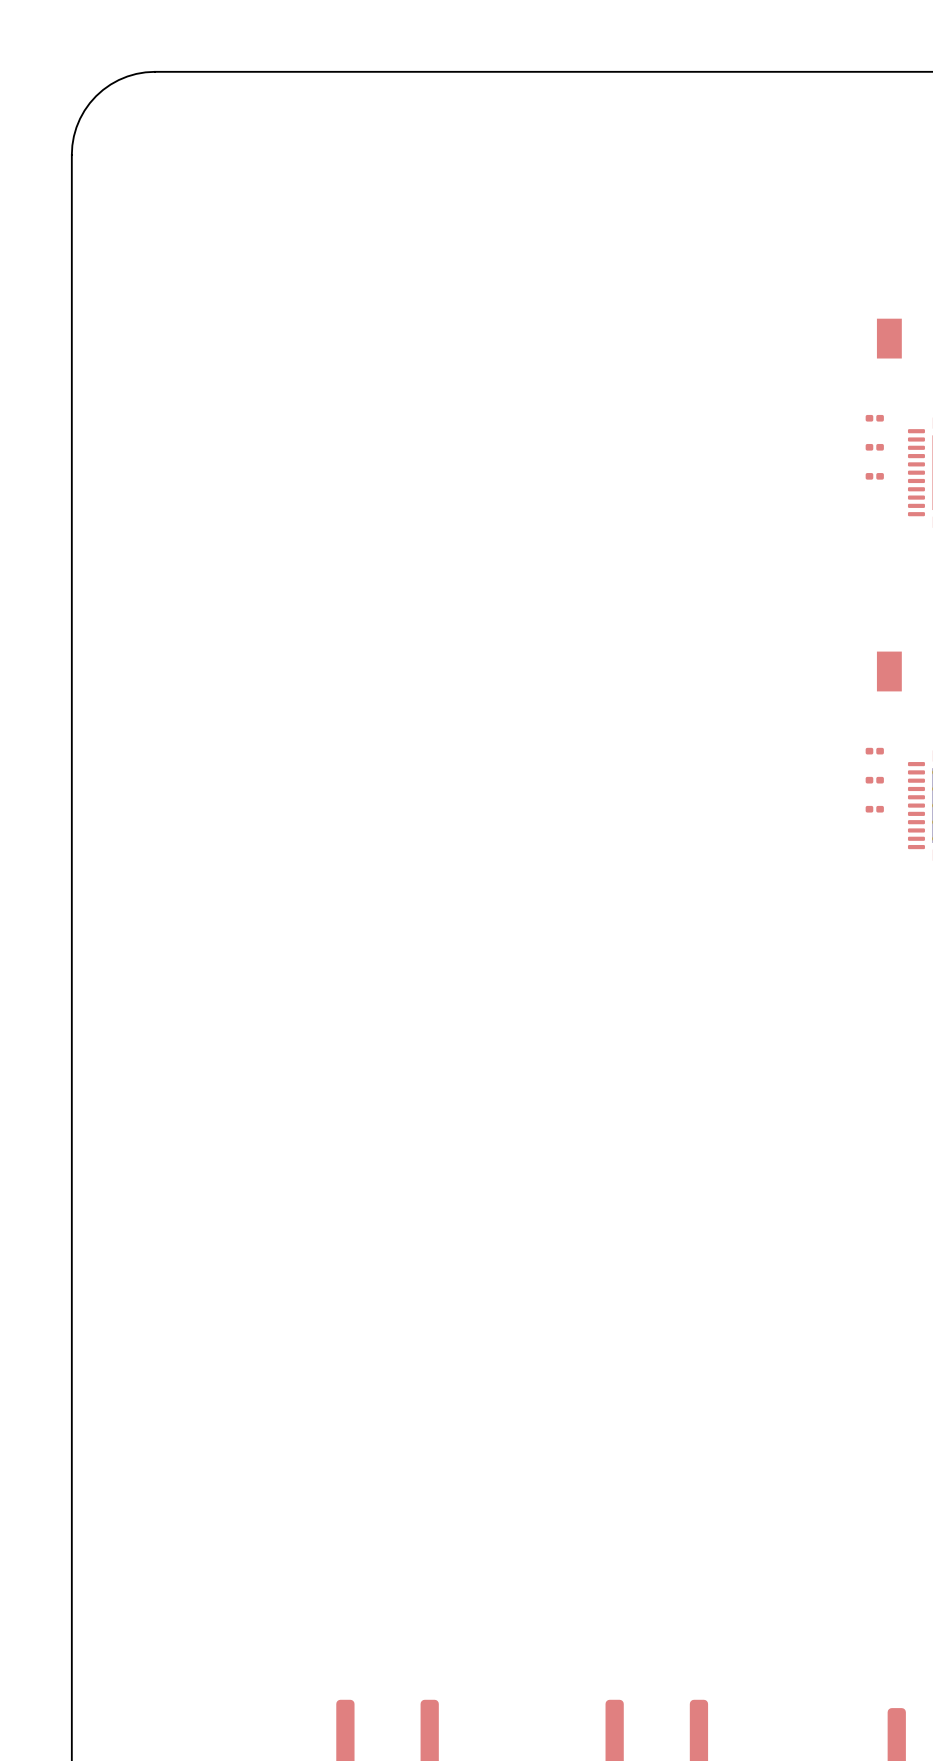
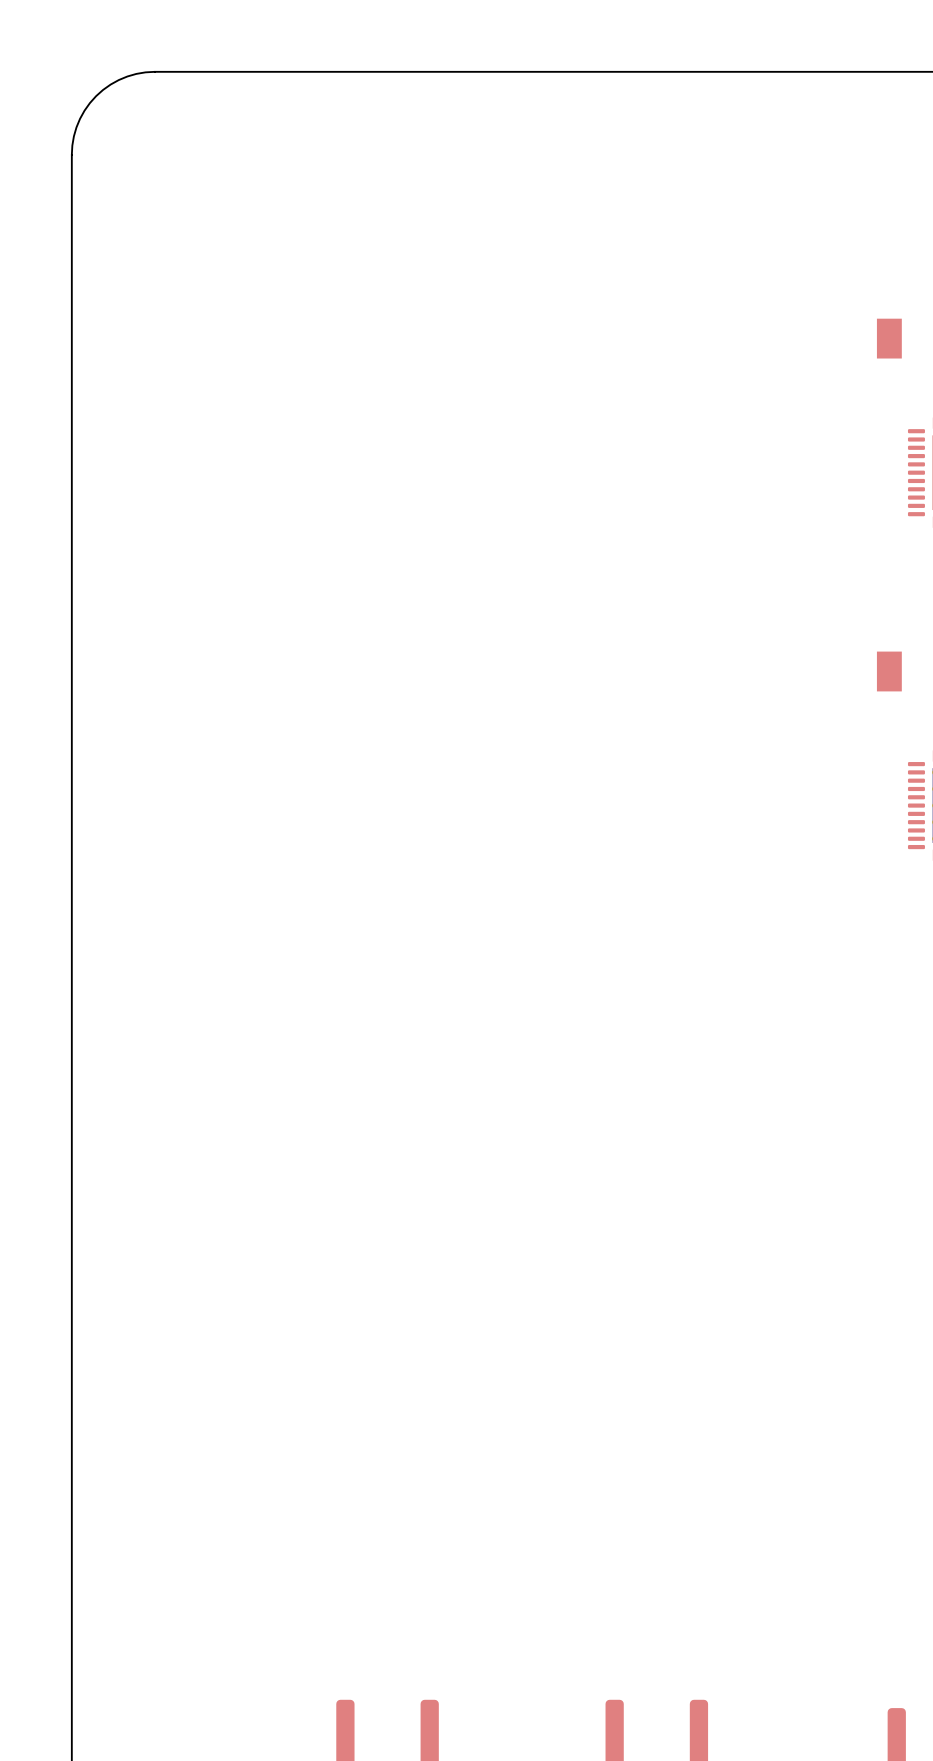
part: (874, 418) -> none
part: (874, 447) -> none
part: (874, 476) -> none
part: (874, 751) -> none
part: (874, 780) -> none
part: (874, 809) -> none

